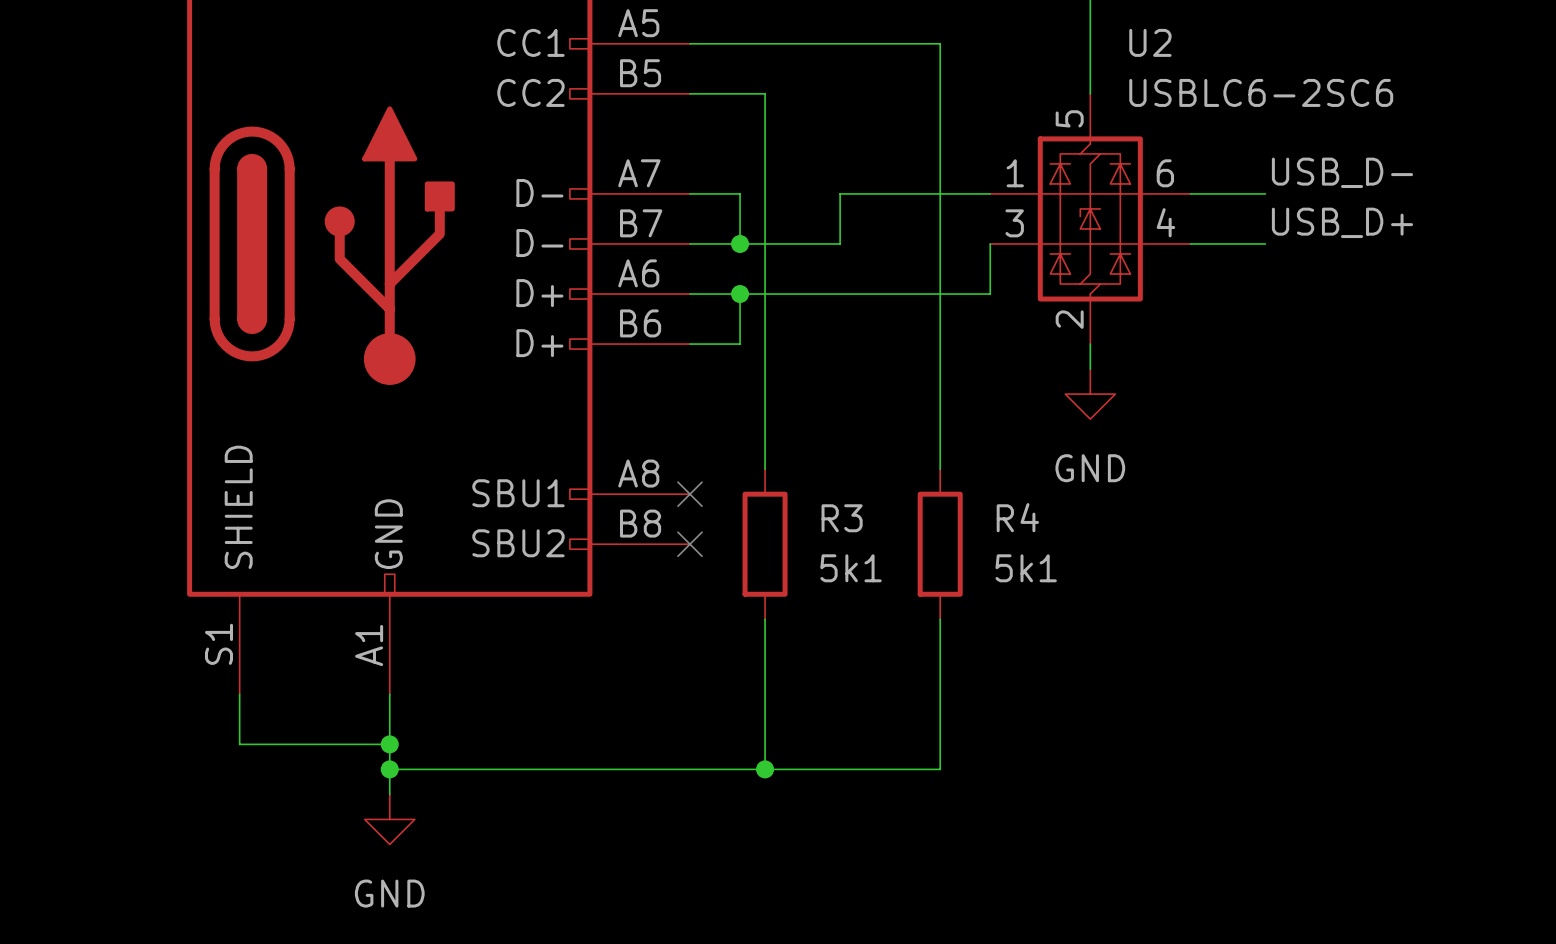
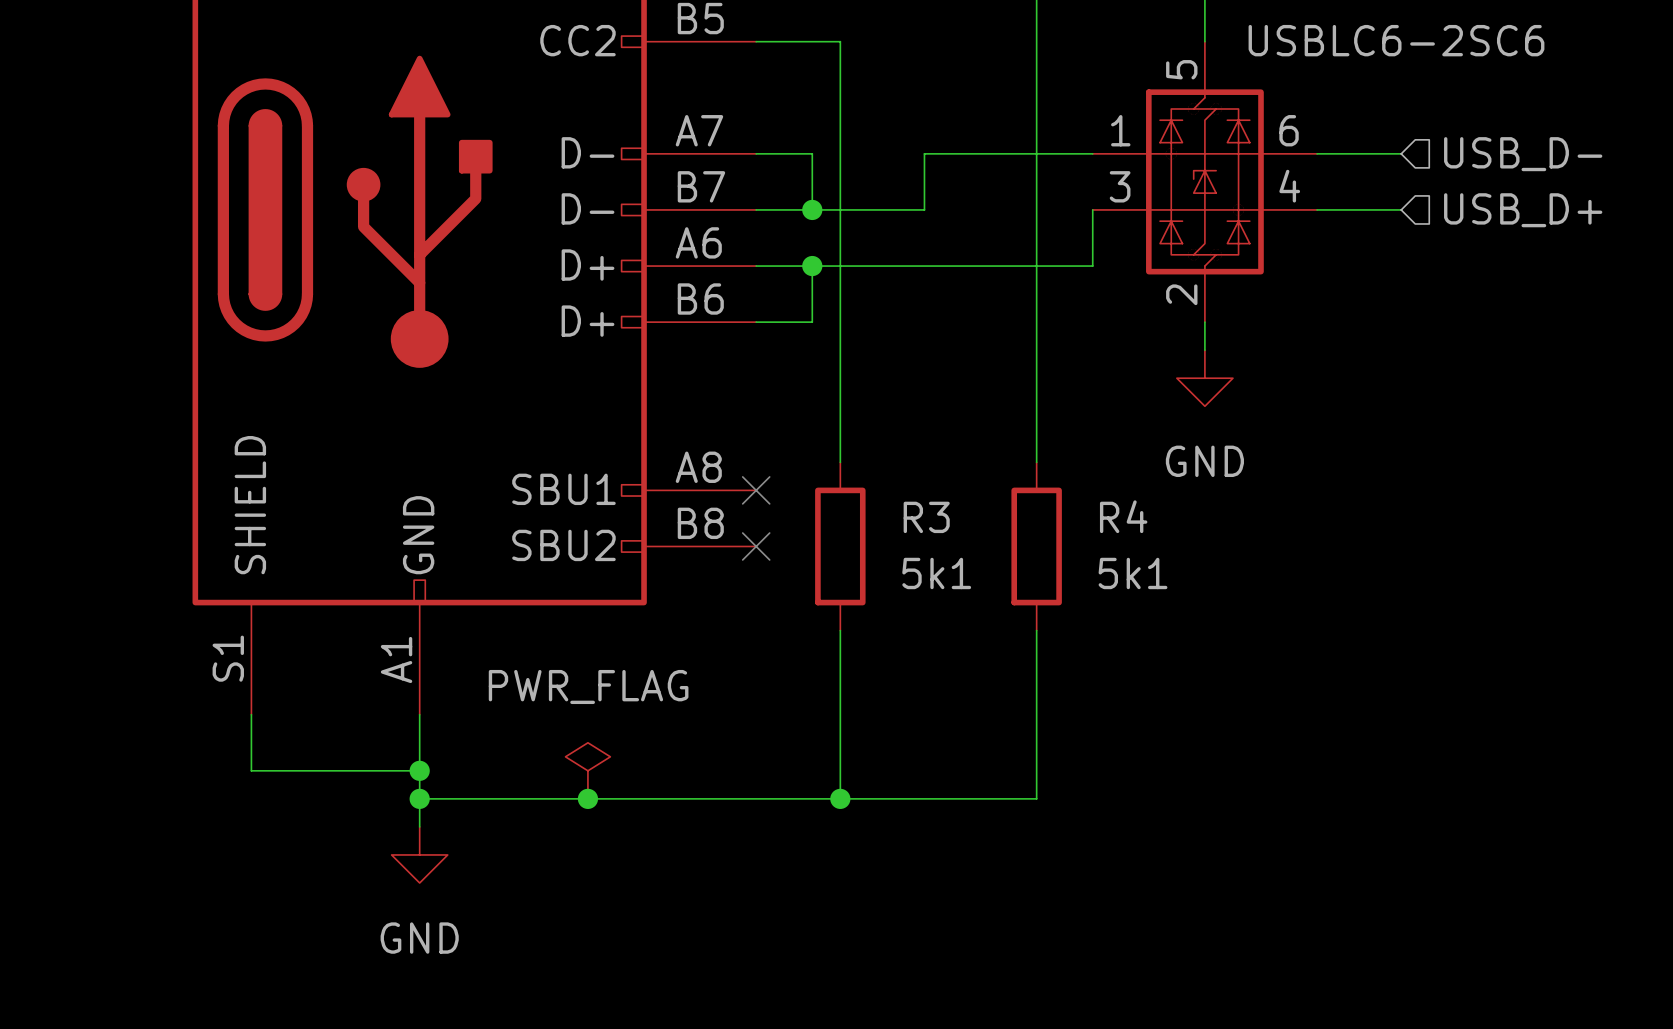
label: USB_D- (1342, 172) -> none
hierarchical label: none -> USB_D- (1523, 154)
label: USB_D+ (1342, 222) -> none
hierarchical label: none -> USB_D+ (1523, 210)
power symbol: none -> PWR_FLAG (587, 770)
junction: none -> (587, 798)

